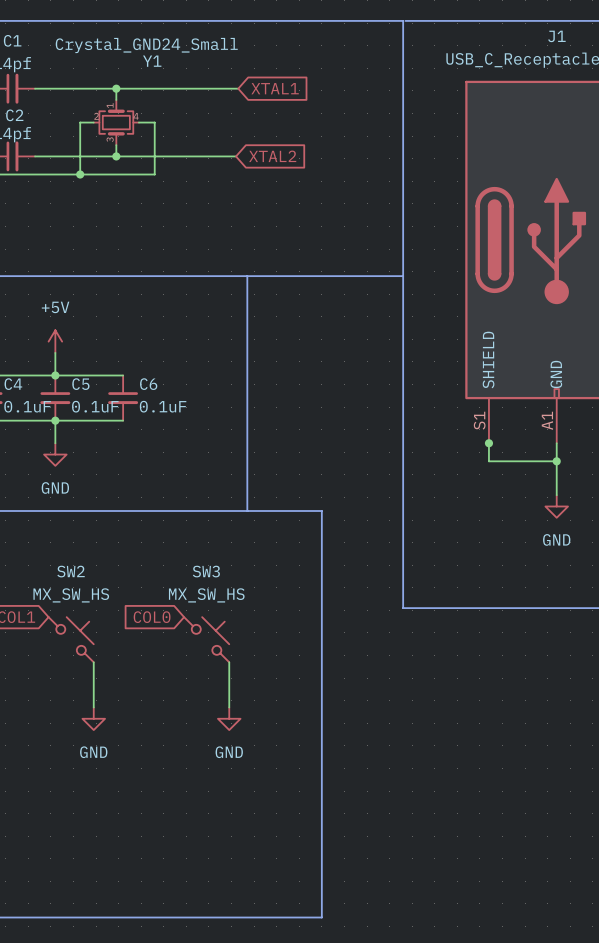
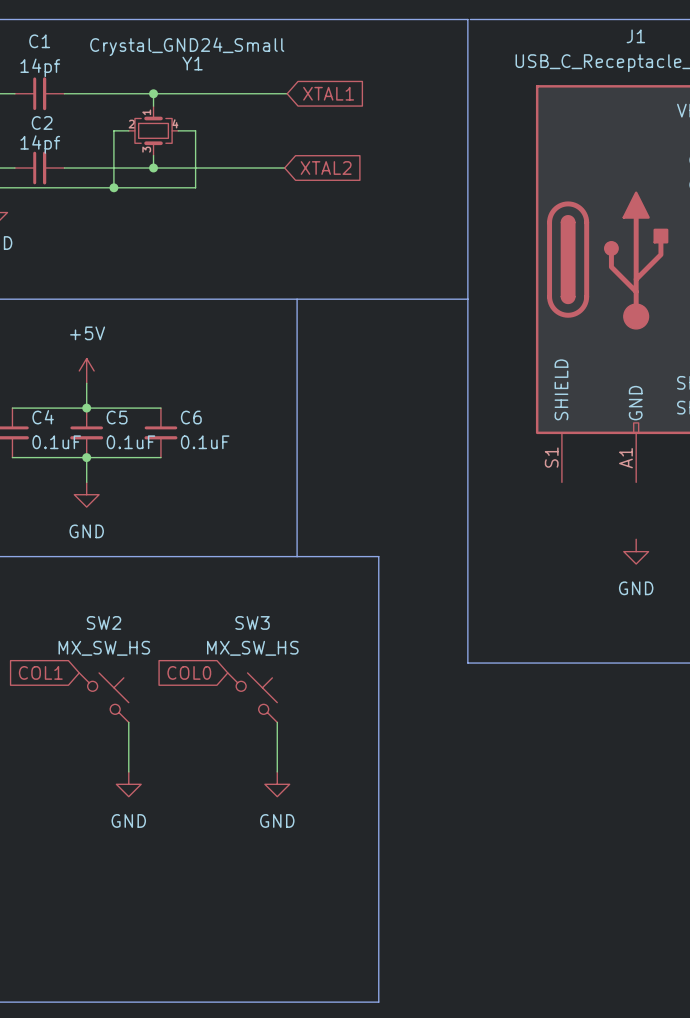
wire: (488, 440) (488, 461) (556, 461) -> none
junction: (488, 443) -> none
wire: (556, 443) (556, 495) -> none
junction: (556, 461) -> none

